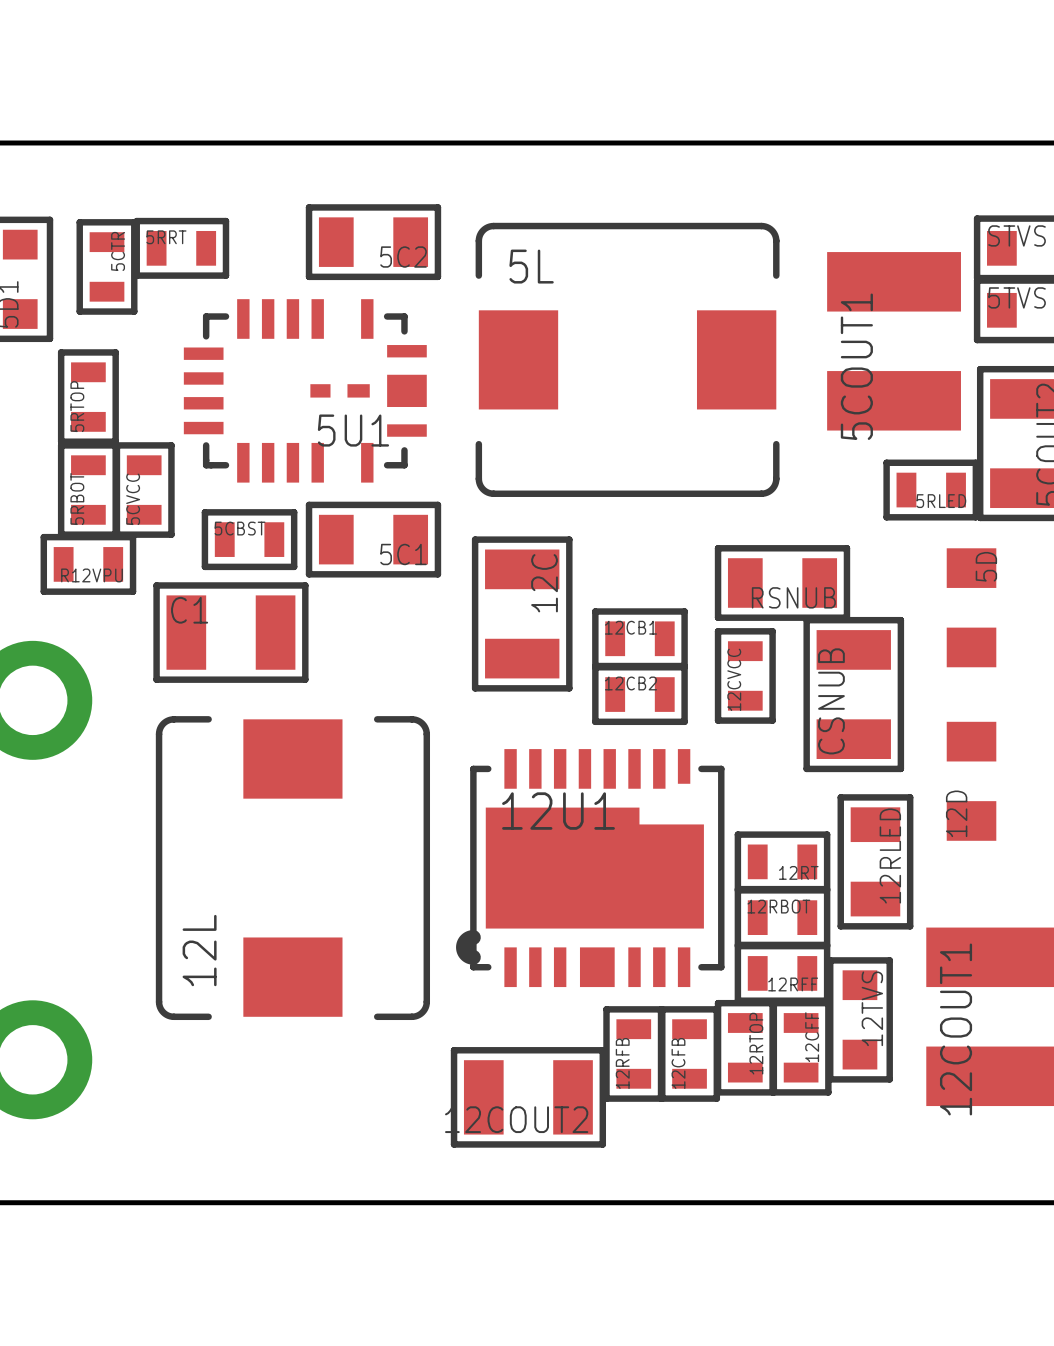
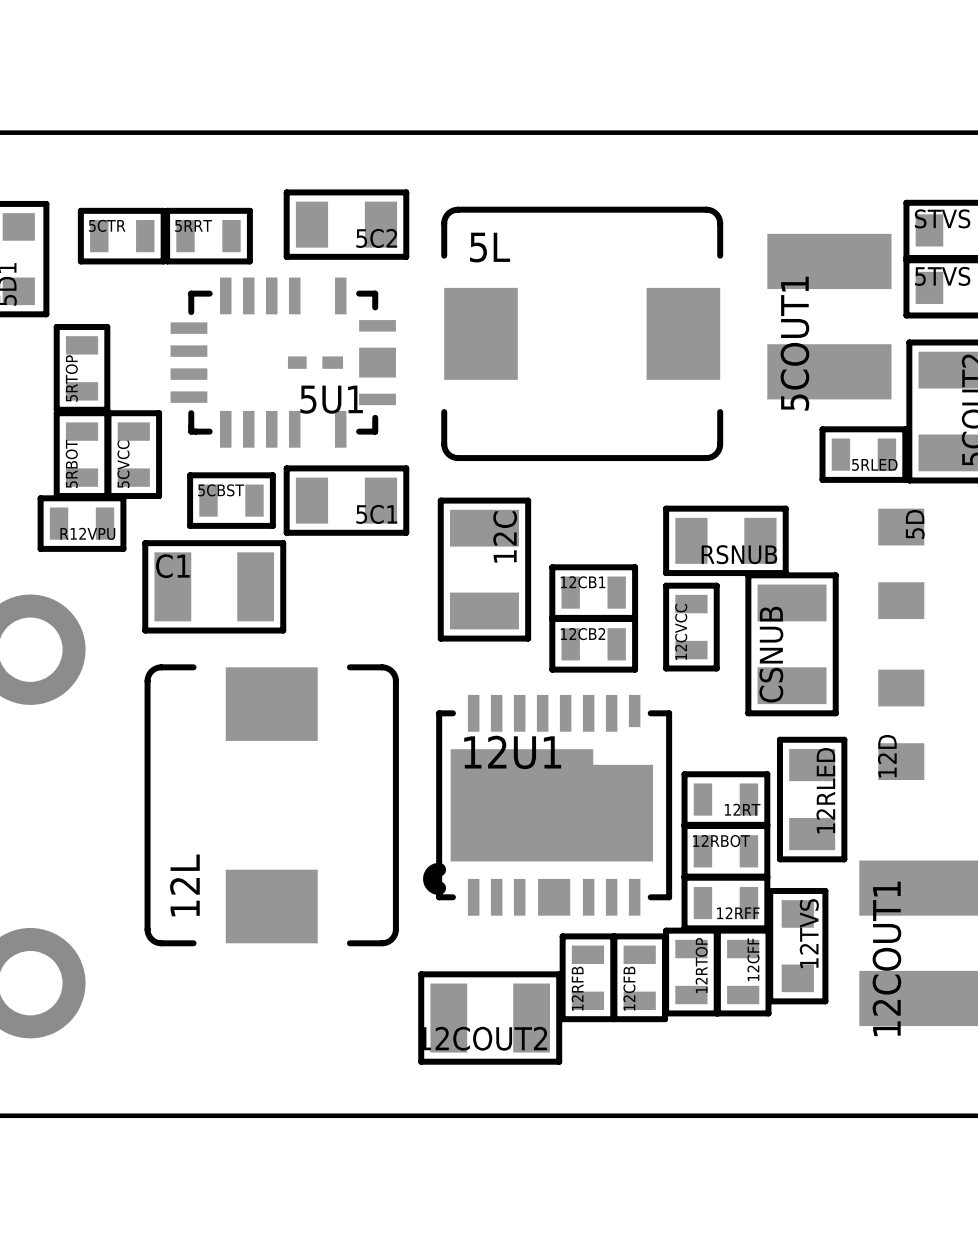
5RRT position: (181, 248) -> (208, 236)
5CTR rotation: 0° (107, 266) -> 90° clockwise (122, 236)

